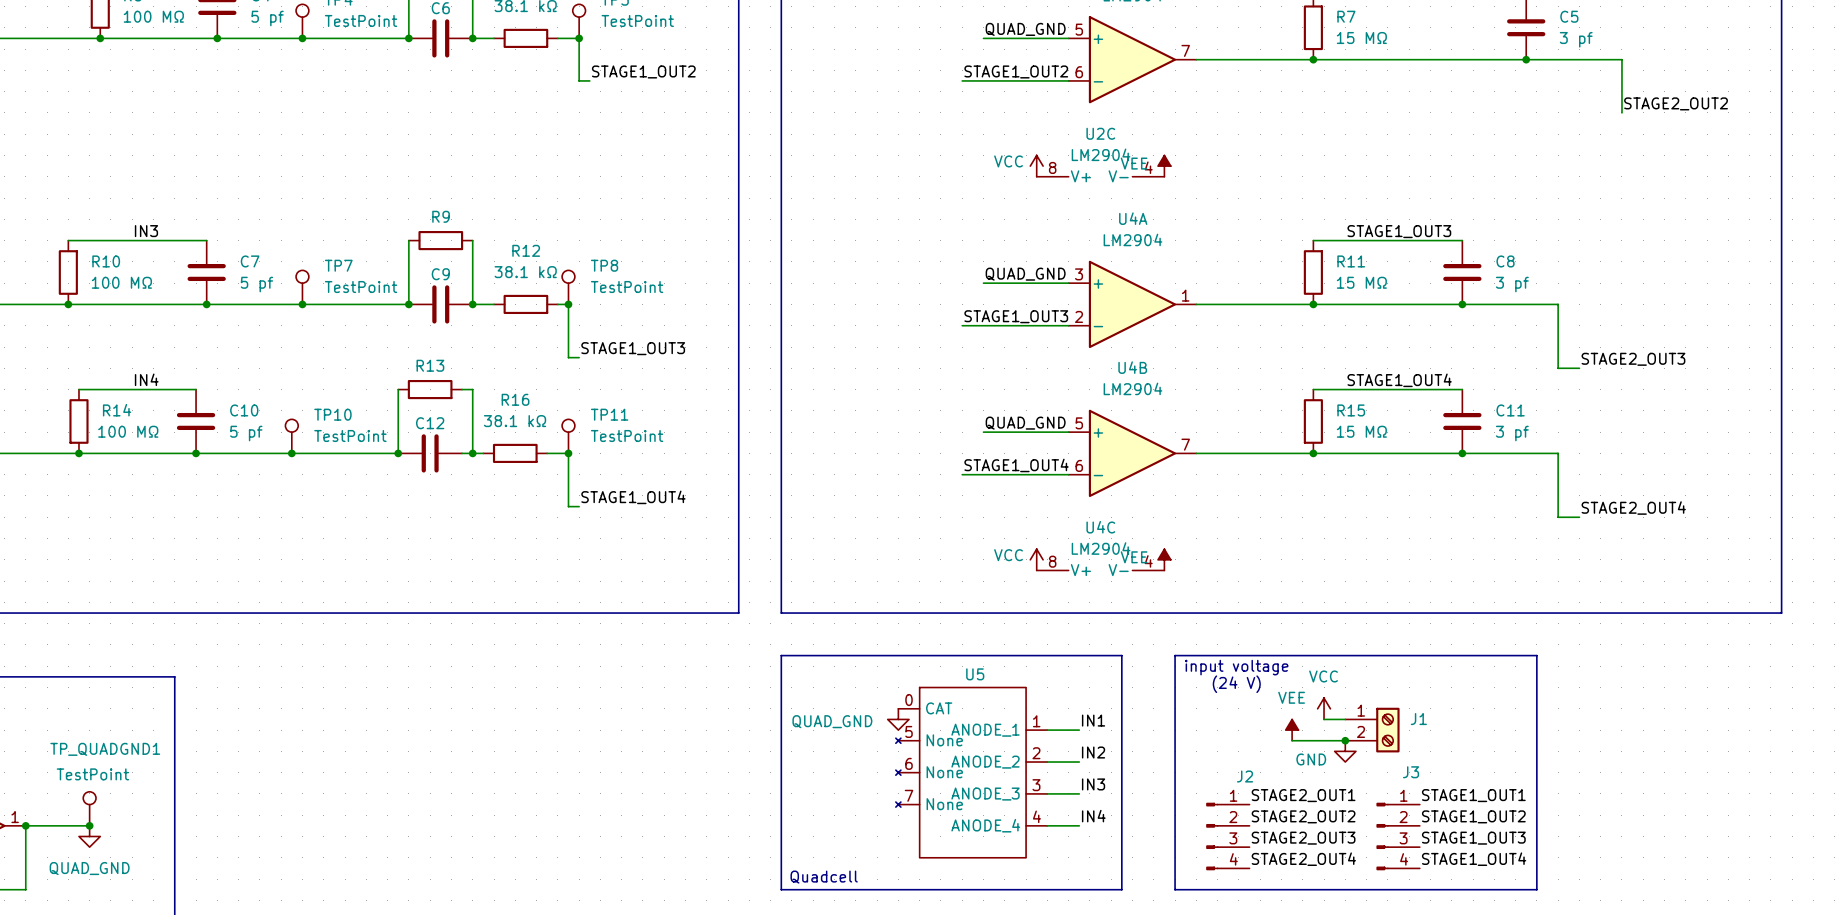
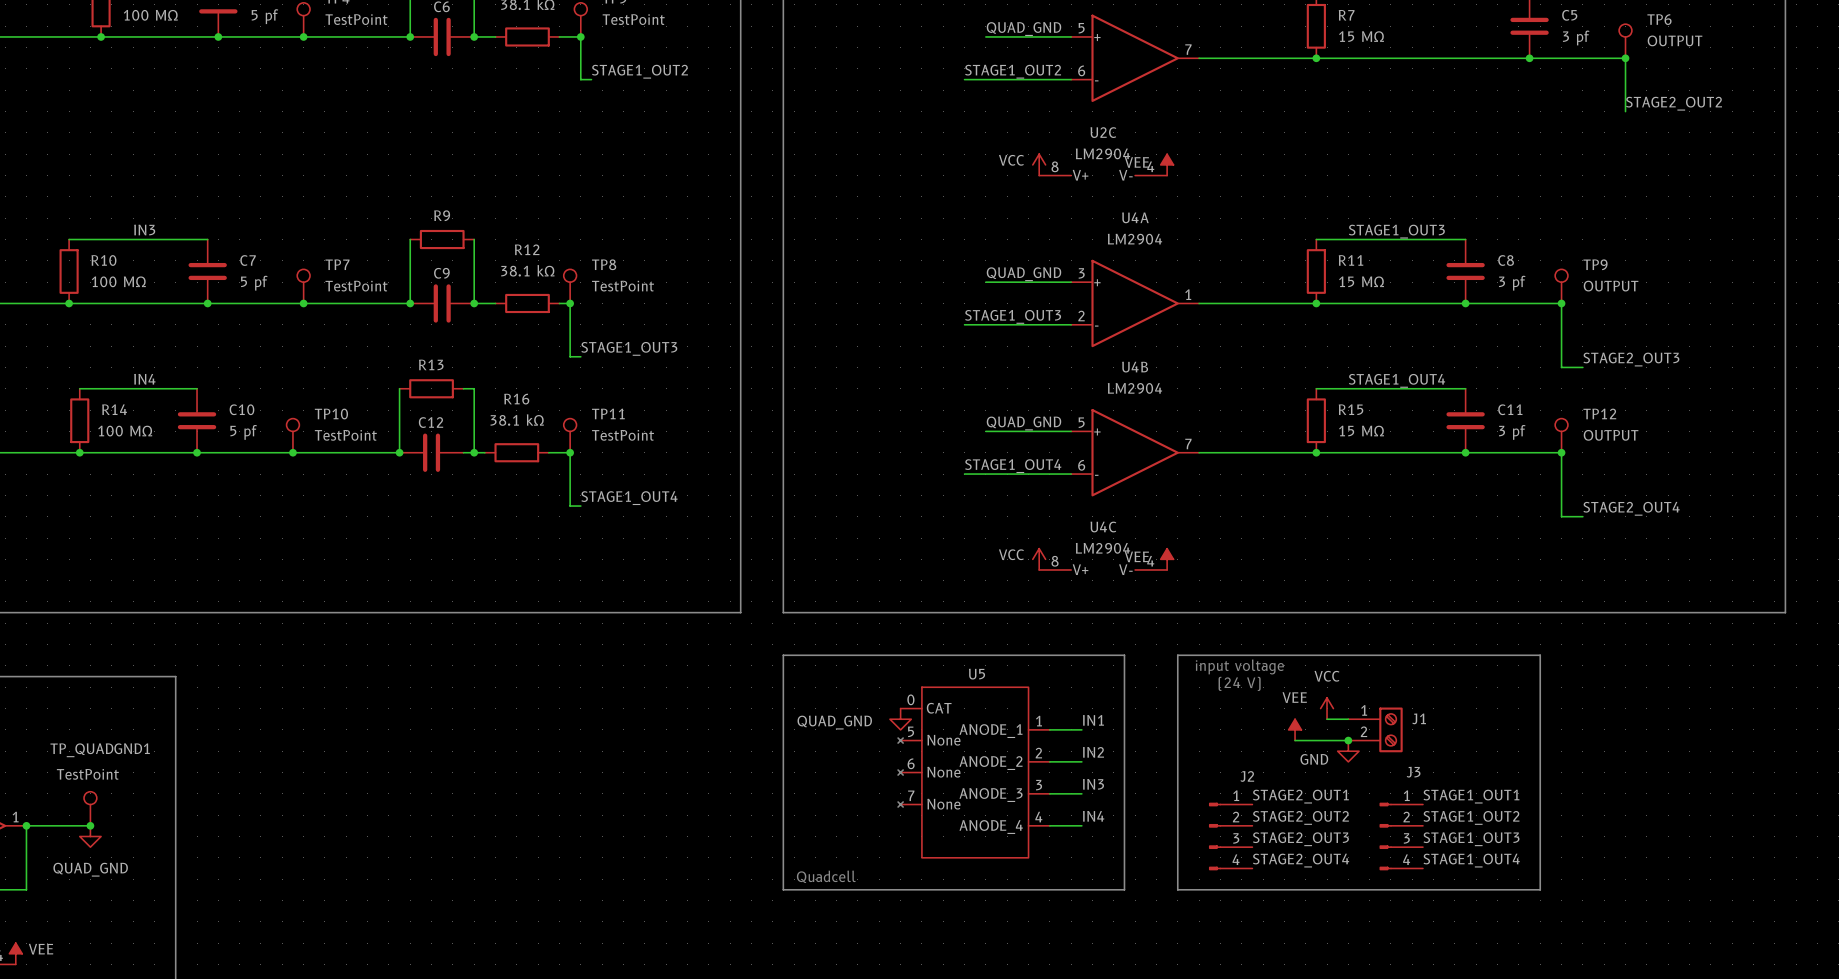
TP6: none -> OUTPUT (1625, 41)
junction: none -> (1625, 58)
TP9: none -> OUTPUT (1561, 286)
junction: none -> (1561, 303)
TP12: none -> OUTPUT (1561, 435)
junction: none -> (1561, 452)

